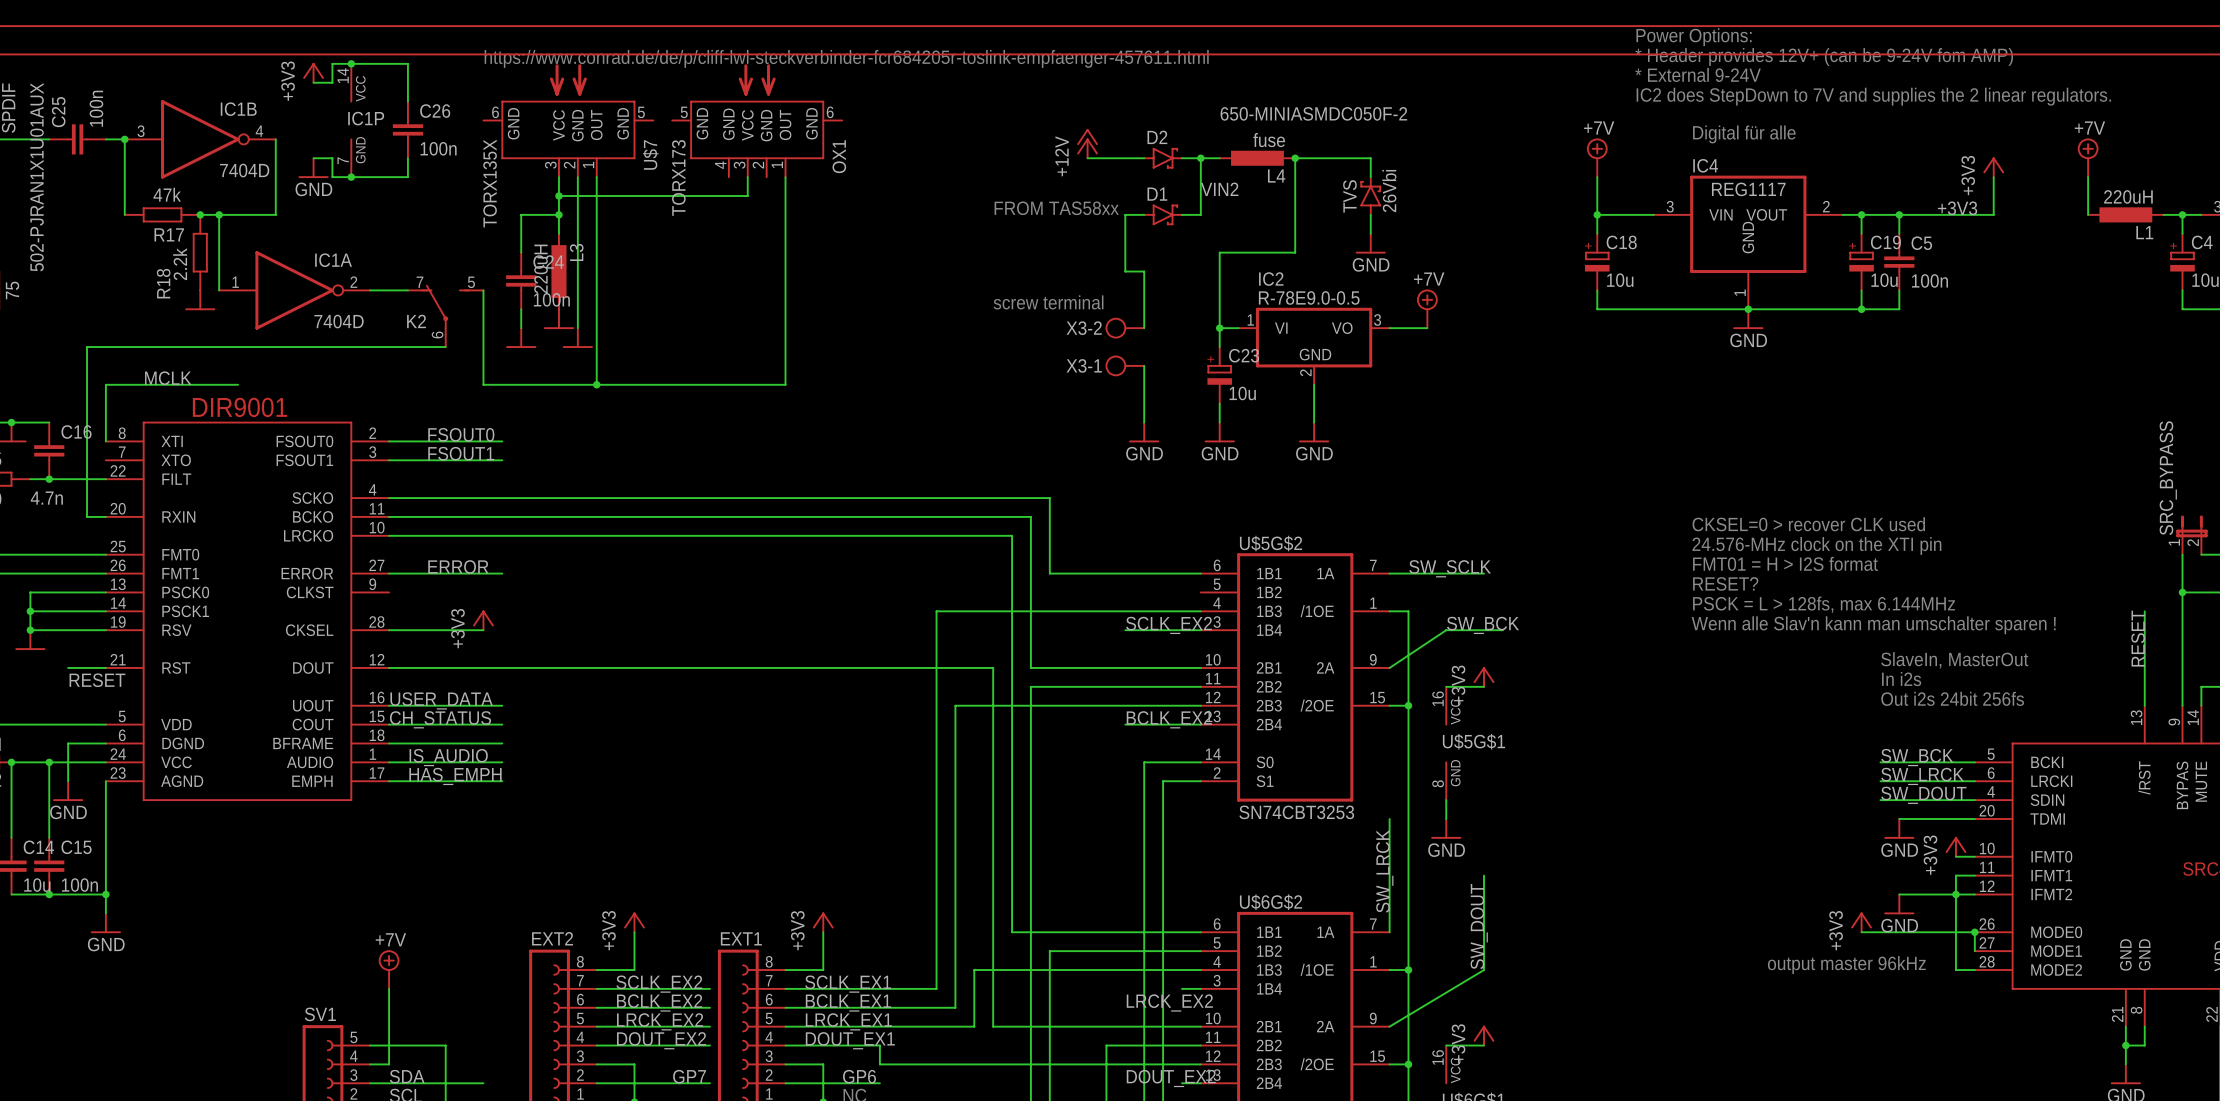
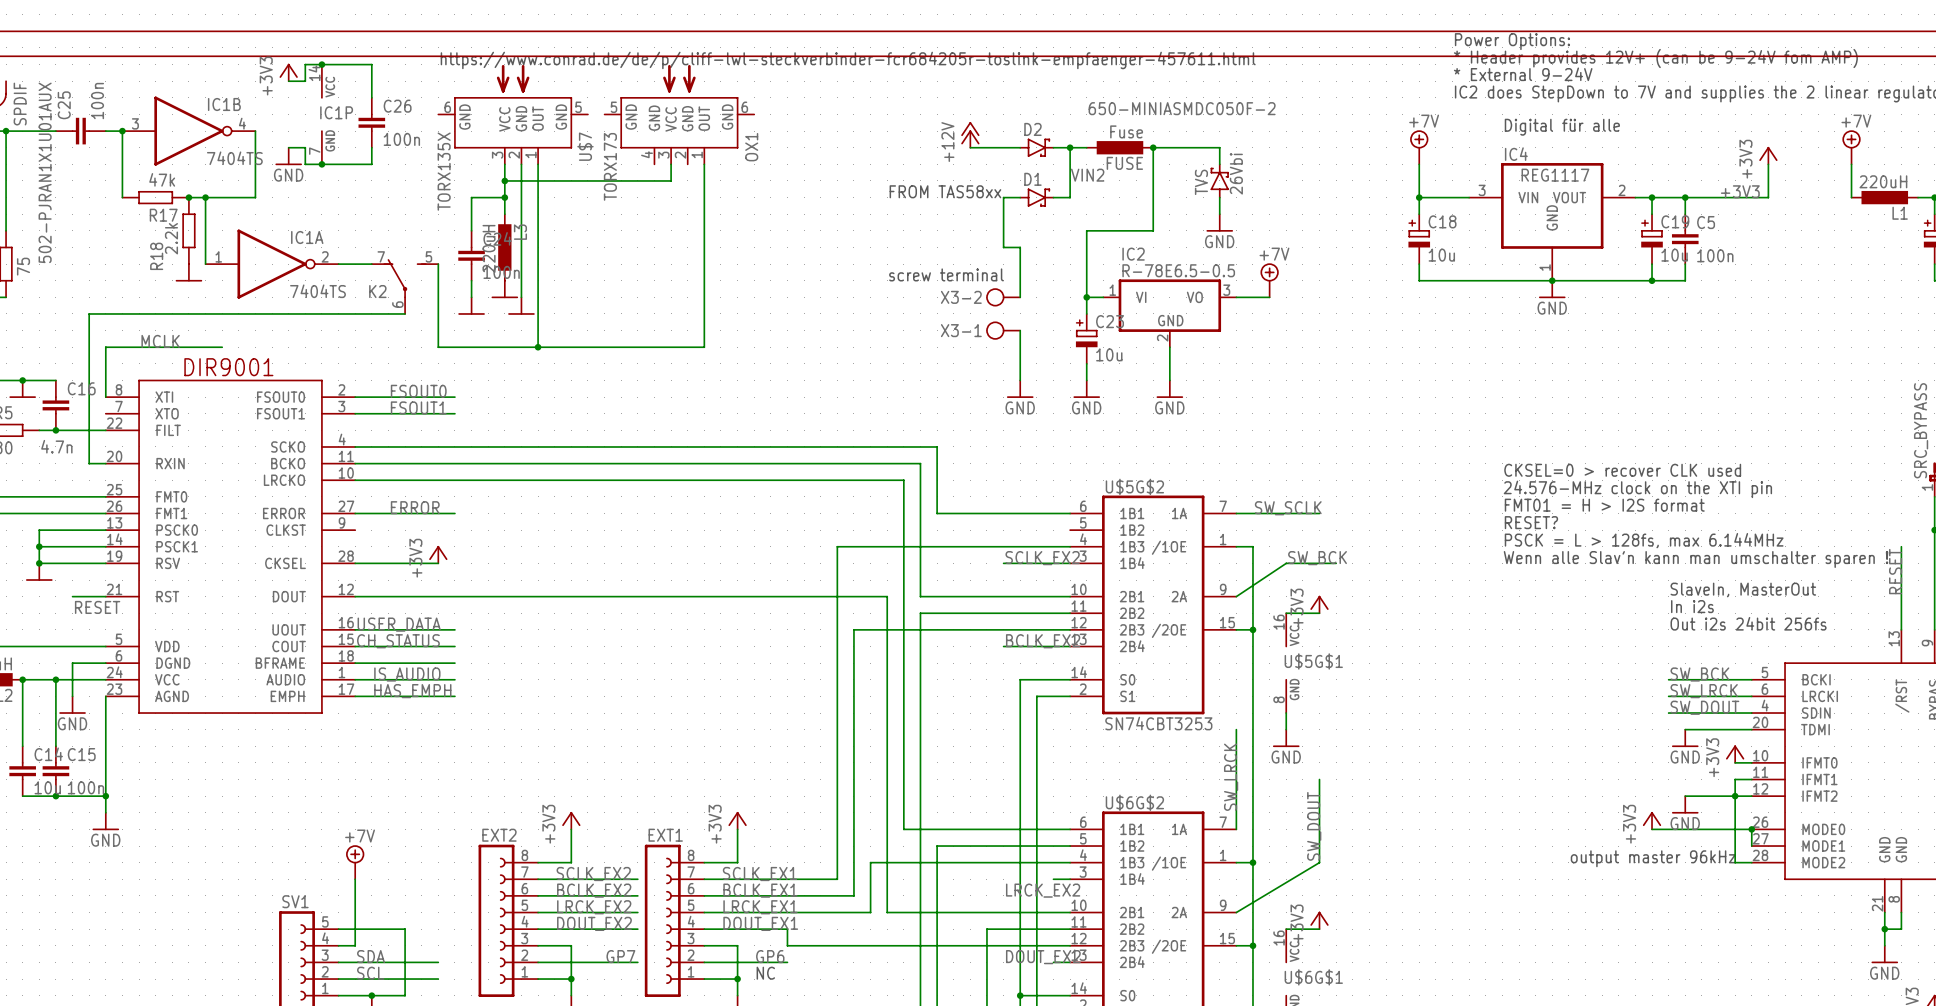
L4 value: fuse (1269, 140) -> Fuse (1126, 131)
IC1B value: 7404D (244, 170) -> 7404TS (234, 158)
L4 name: L4 (1276, 176) -> FUSE (1124, 163)
IC2 value: R-78E9.0-0.5 (1309, 297) -> R-78E6.5-0.5 (1178, 270)
IC1A value: 7404D (339, 321) -> 7404TS (317, 291)

